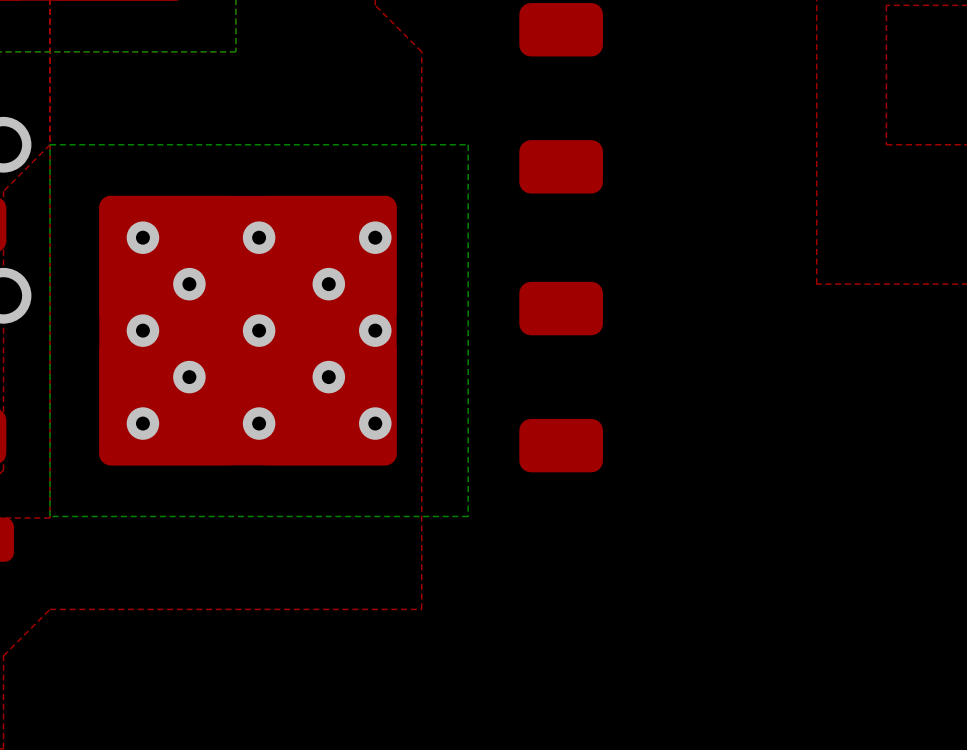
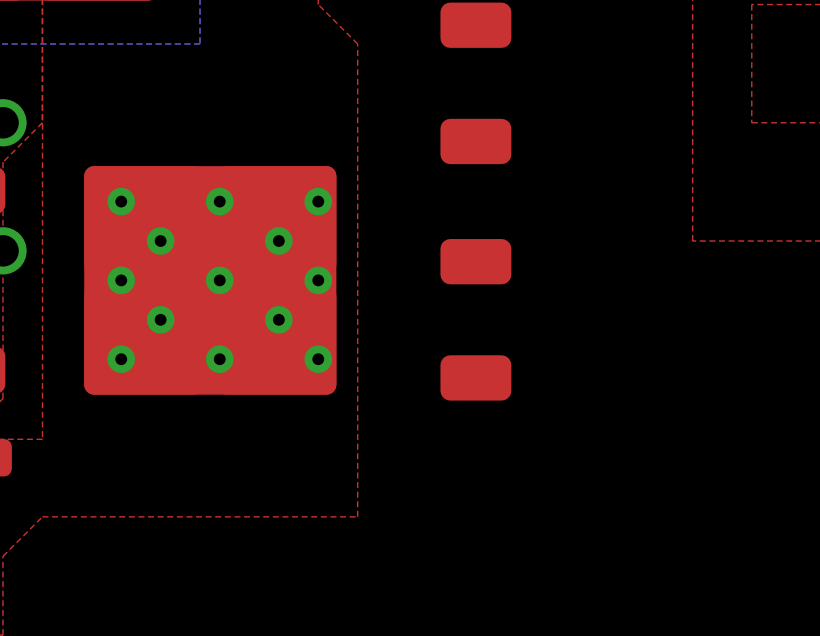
bottom zone outline: (468, 144) (468, 516) (50, 516) (50, 144) (468, 144) -> none

